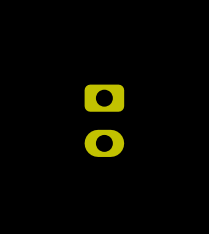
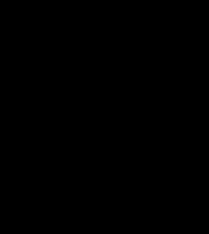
part: (104, 120) -> none

